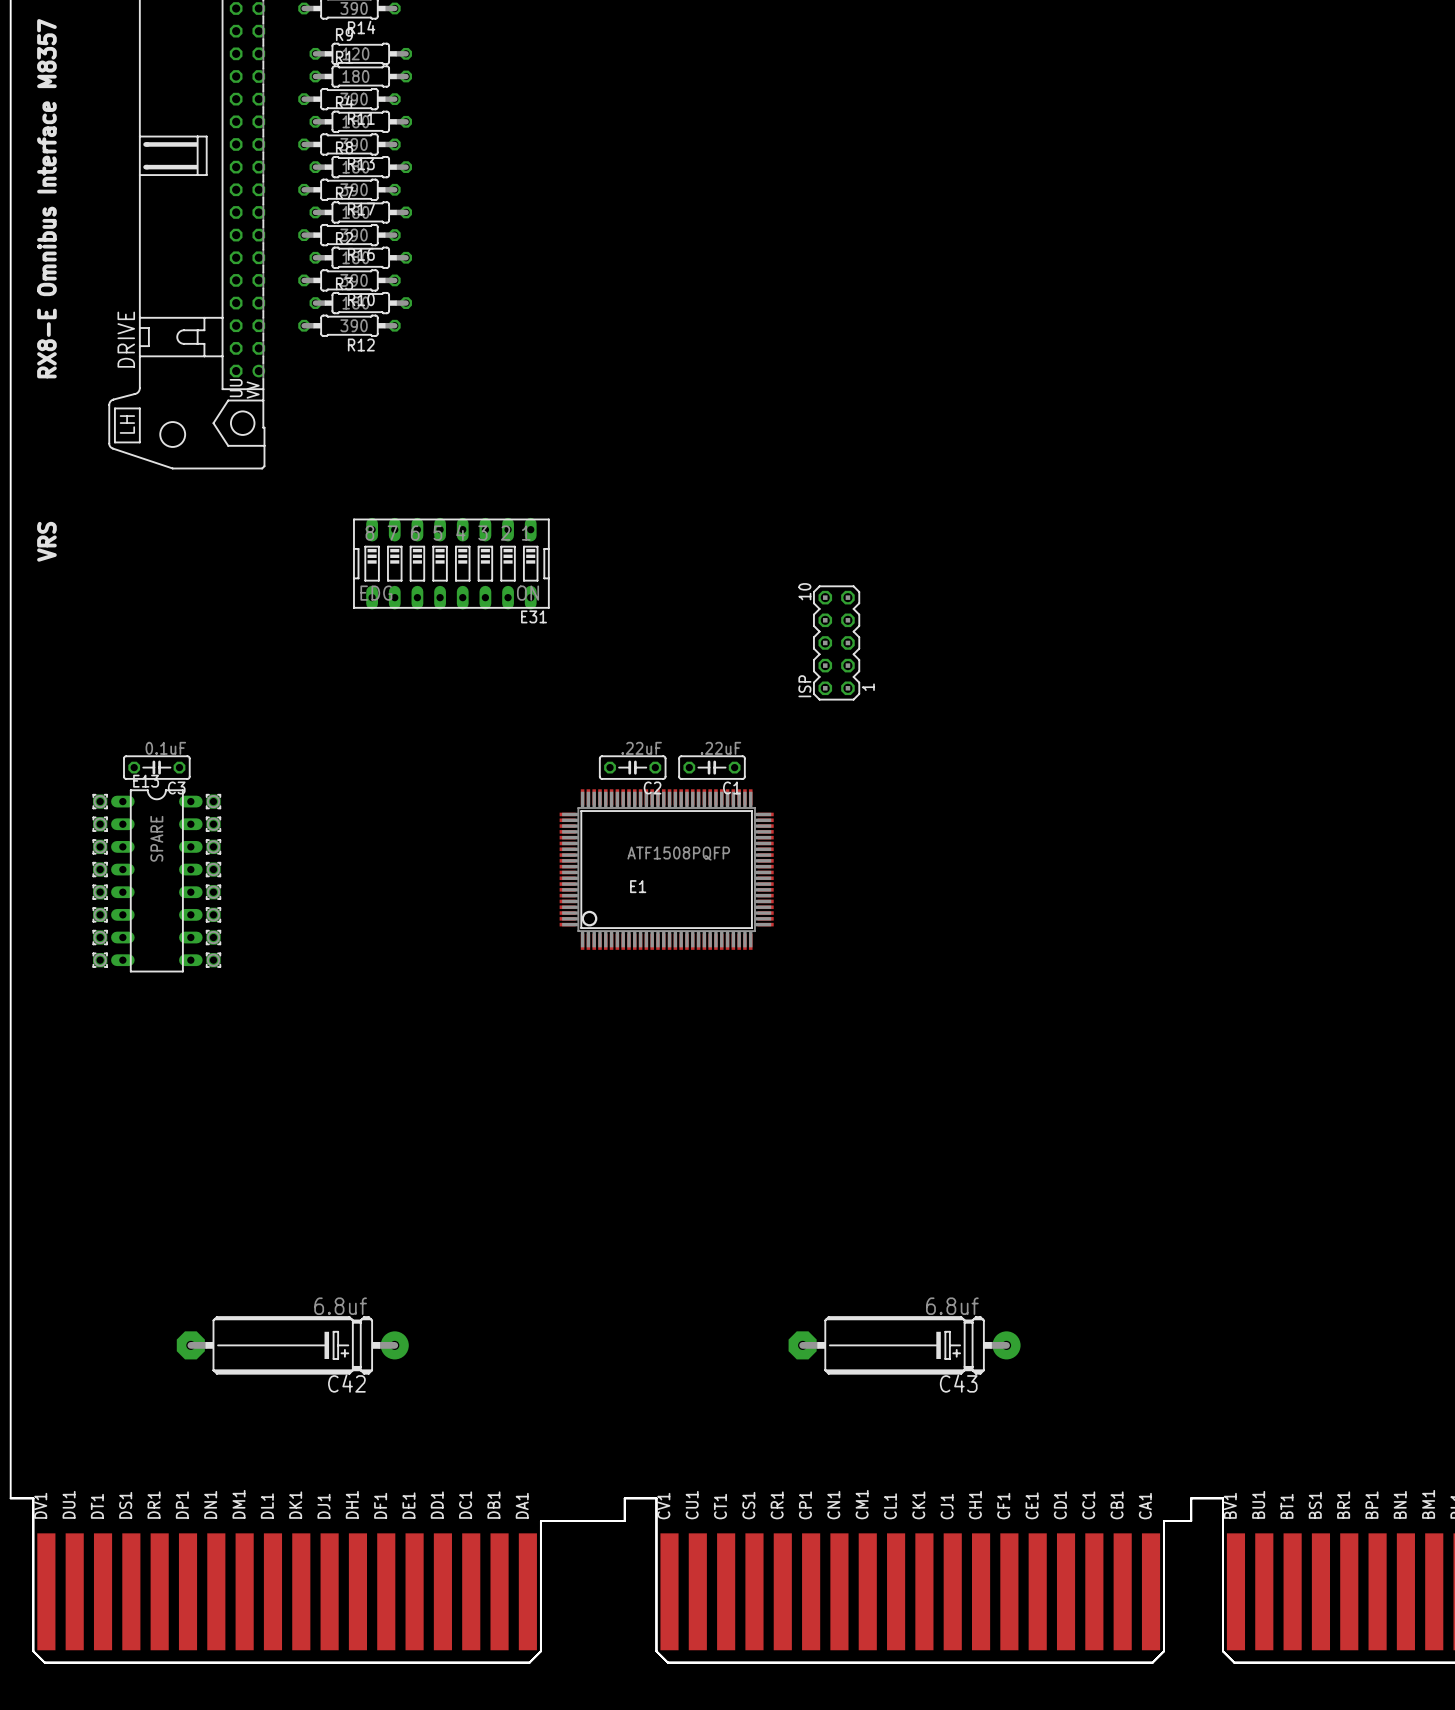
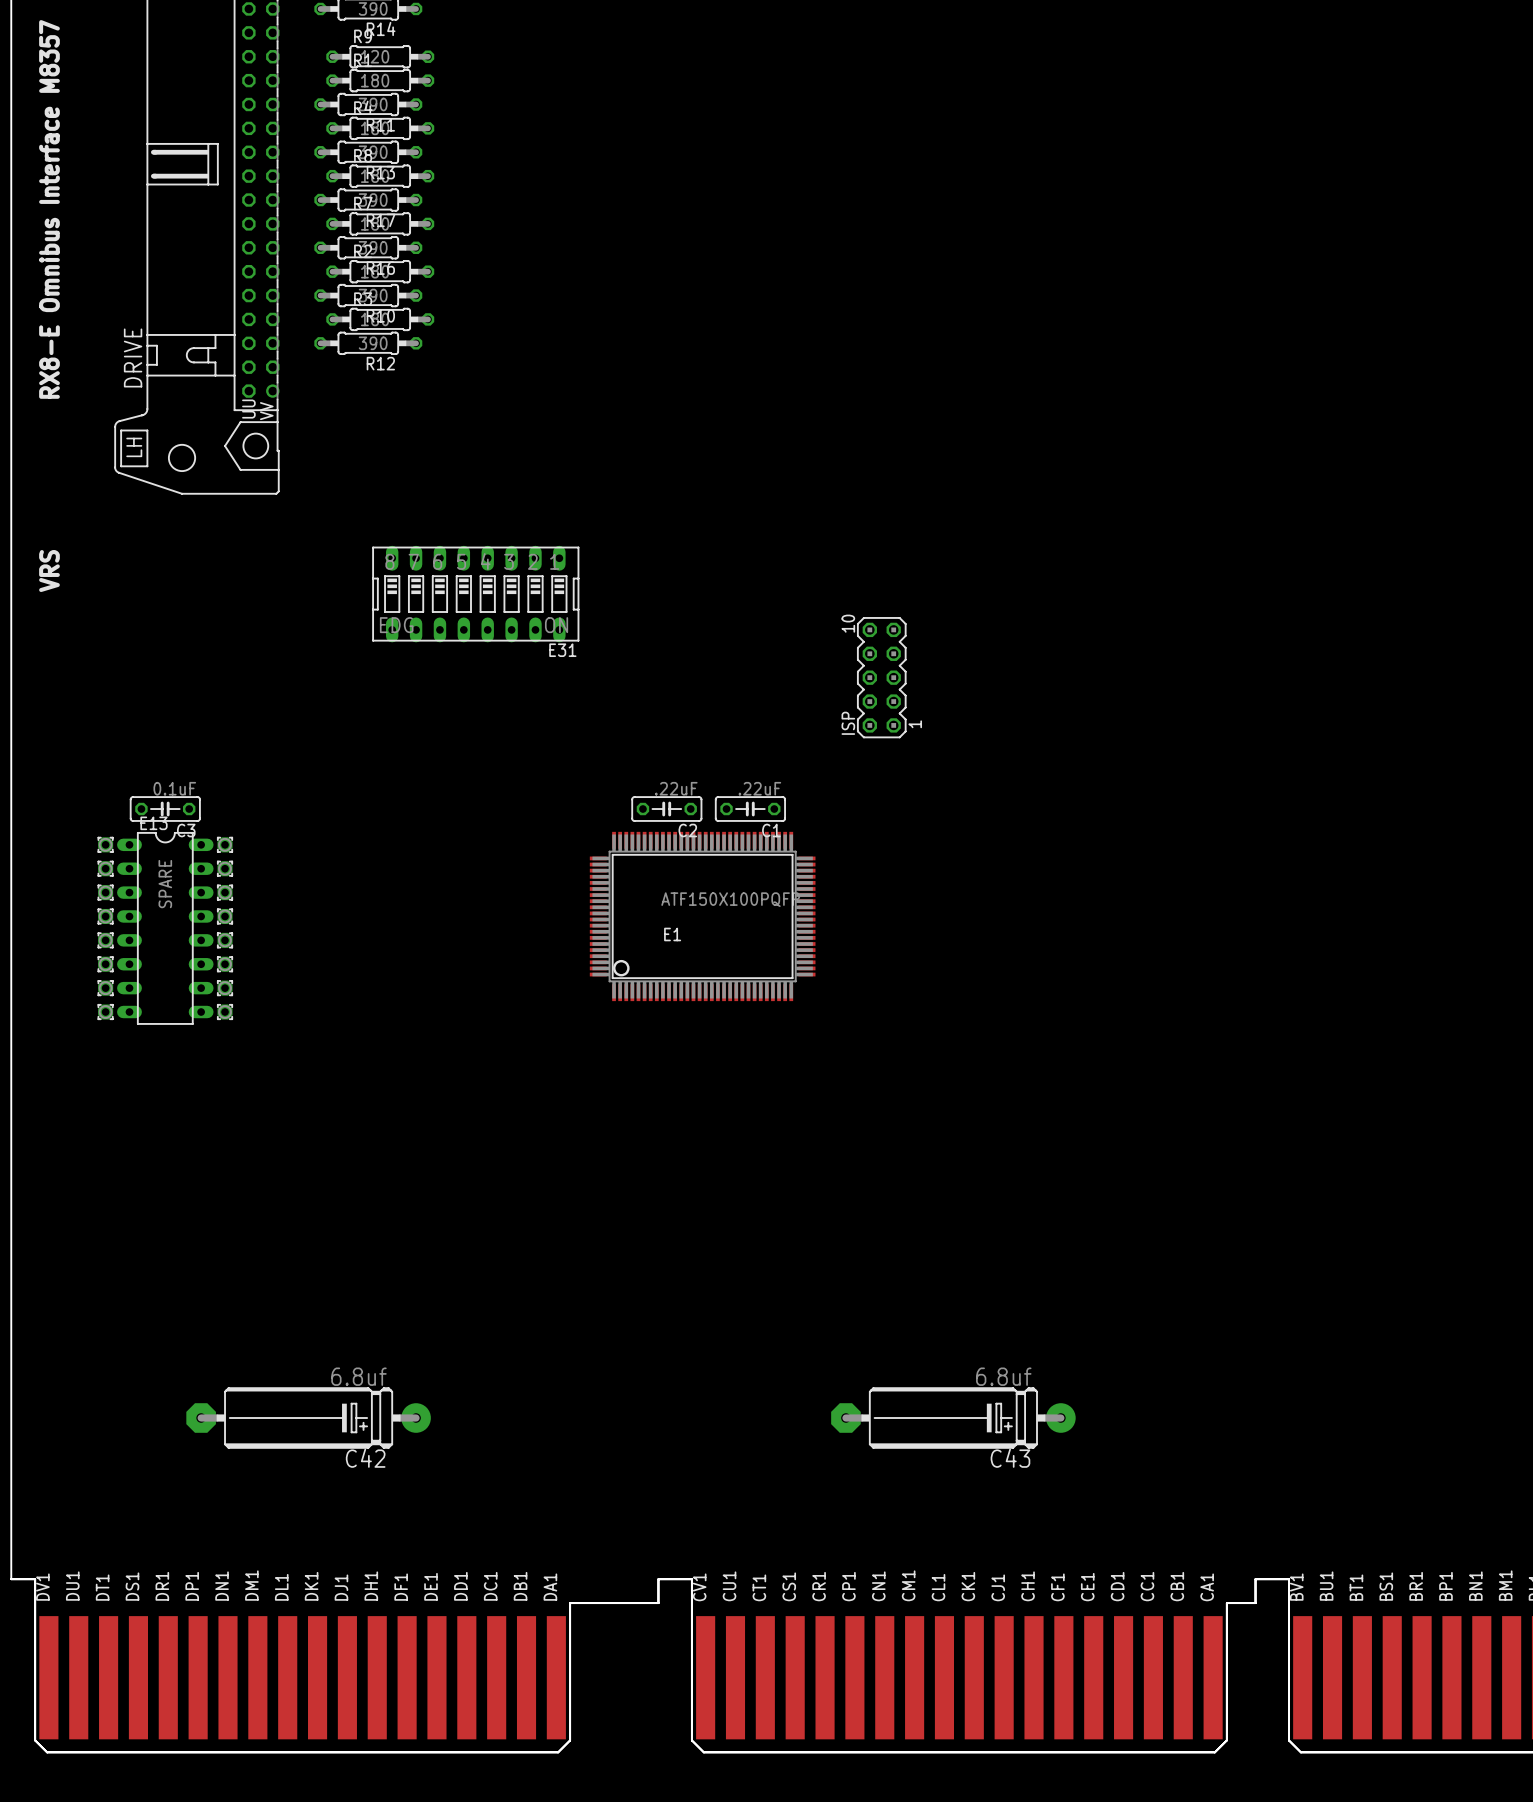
E1 value: ATF1508PQFP (678, 853) -> ATF150X100PQFP (730, 899)

